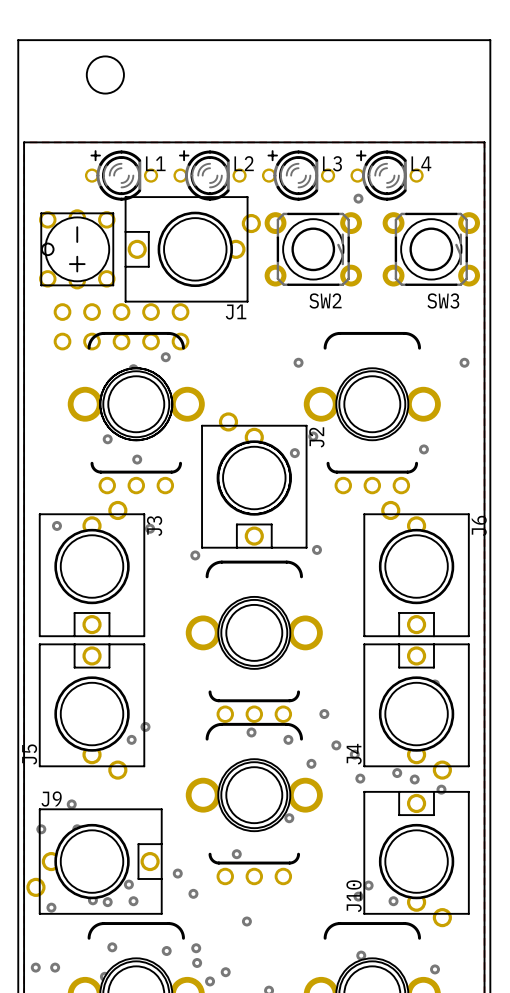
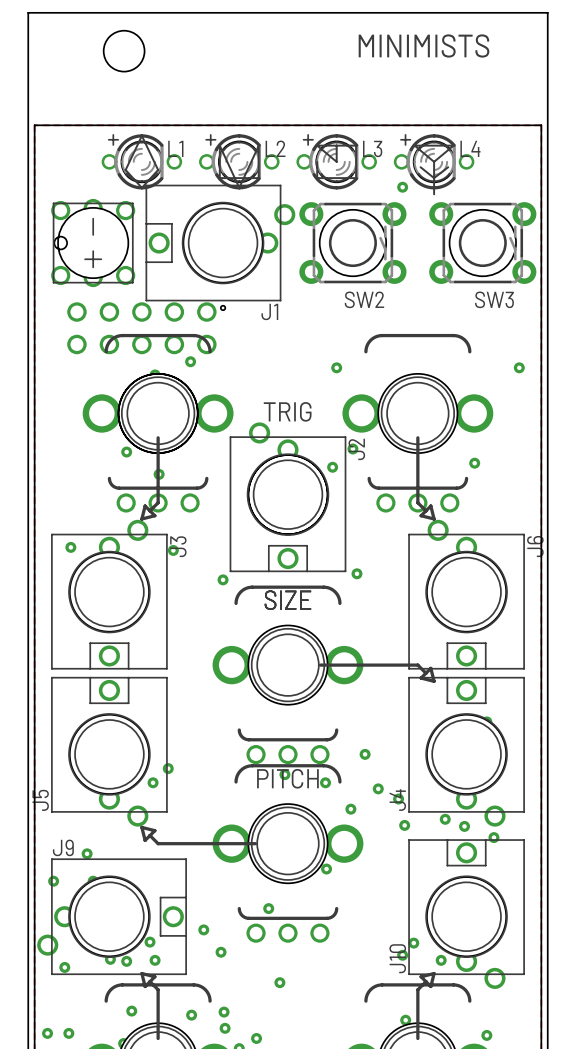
text: none -> MINIMISTS (424, 45)
line: none -> (141, 135) (125, 169) (141, 187) (158, 169) (141, 135)
line: none -> (219, 145) (239, 187) (258, 145) (258, 178) (219, 178) (219, 145)
line: none -> (336, 145) (336, 161) (317, 145) (356, 145) (356, 178) (317, 178) (317, 161)
line: none -> (434, 161) (434, 194)
line: none -> (434, 161) (453, 145) (414, 145) (434, 161)
line: none -> (420, 167) (434, 178) (448, 167)
hole: none -> (223, 307)
text: none -> TRIG (287, 411)
line: none -> (158, 437) (158, 502) (150, 510)
line: none -> (417, 437) (417, 502) (425, 510)
line: none -> (145, 506) (141, 519) (154, 515) (145, 506)
line: none -> (430, 506) (434, 519) (421, 515) (430, 506)
text: none -> SIZE (287, 600)
line: none -> (320, 665) (417, 665) (425, 673)
line: none -> (430, 668) (434, 681) (421, 678) (430, 668)
text: none -> PITCH (287, 778)
line: none -> (141, 827) (154, 830) (145, 840) (141, 827)
line: none -> (150, 835) (158, 843) (255, 843)
line: none -> (141, 973) (154, 976) (145, 986) (141, 973)
line: none -> (434, 973) (430, 986) (421, 976) (434, 973)
line: none -> (150, 981) (158, 989) (158, 1038)
line: none -> (425, 981) (417, 989) (417, 1038)

